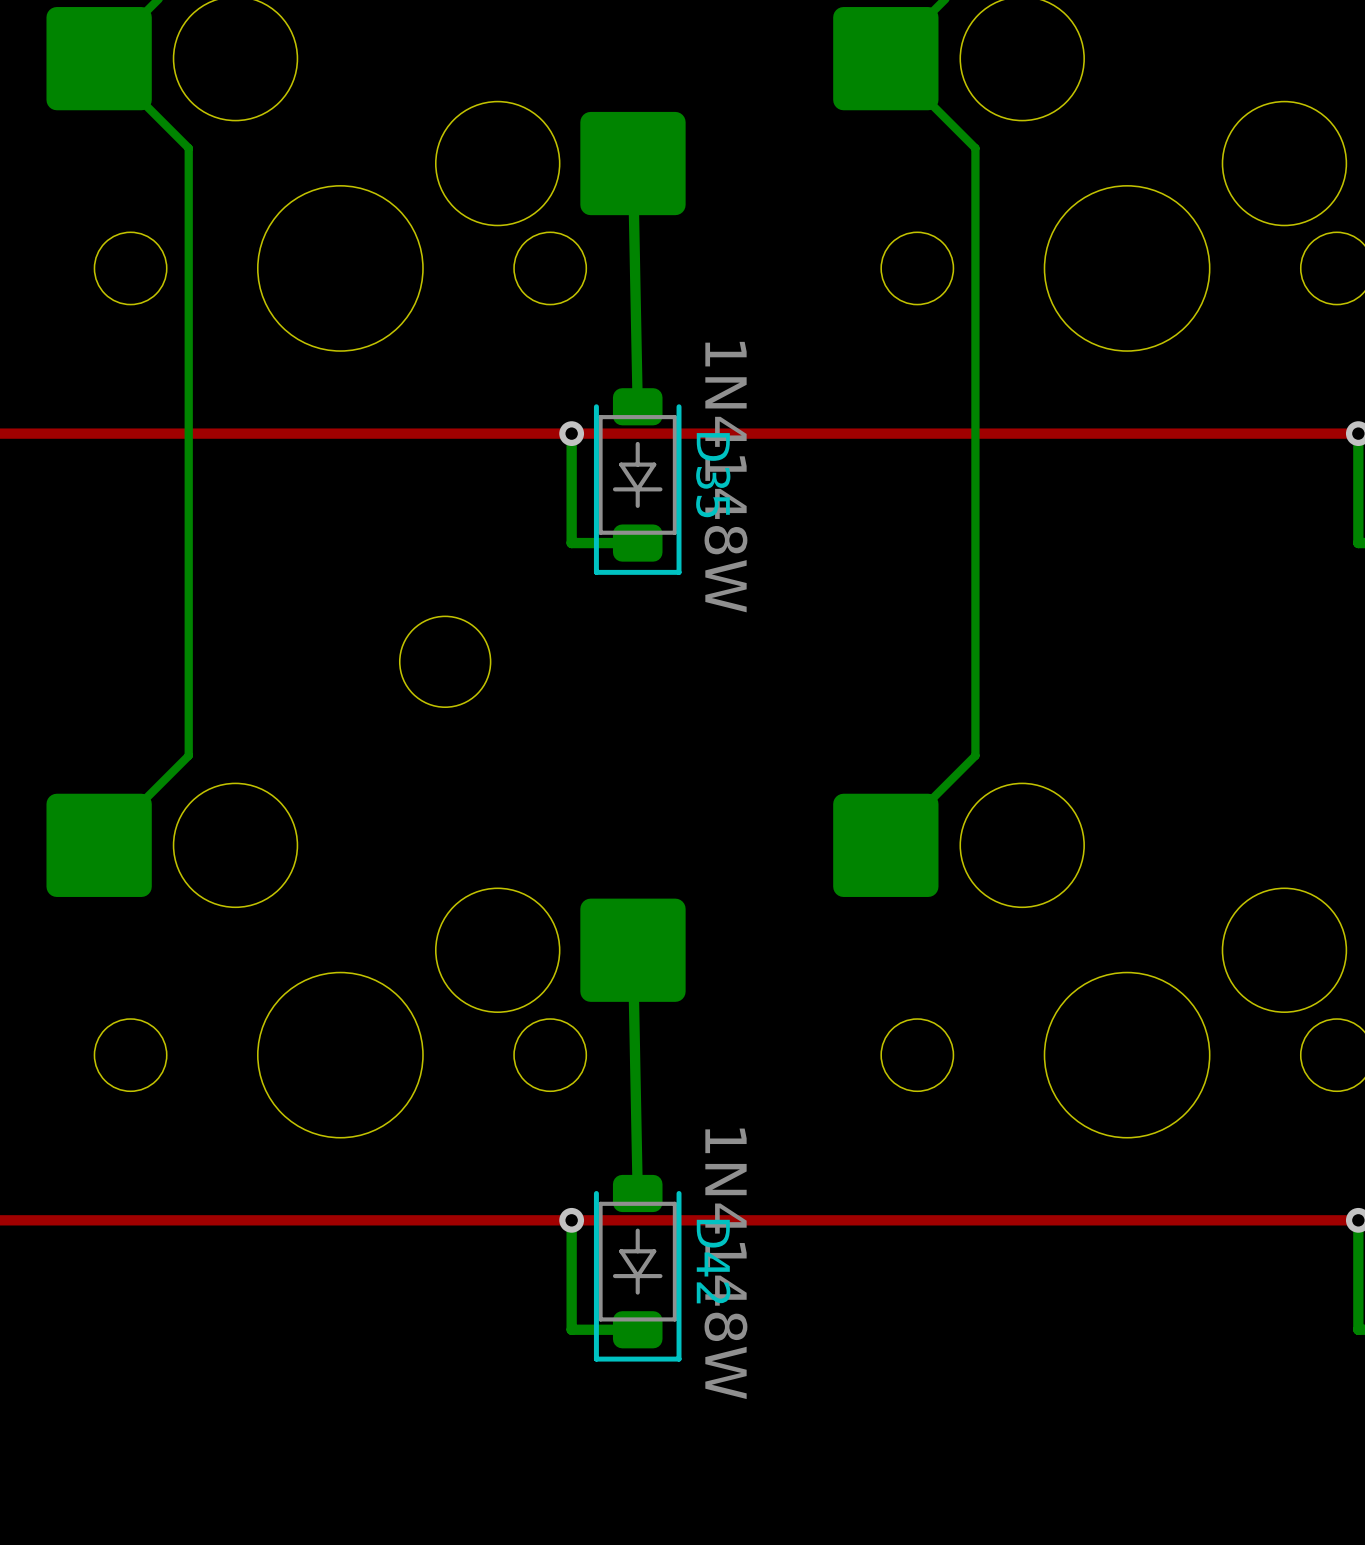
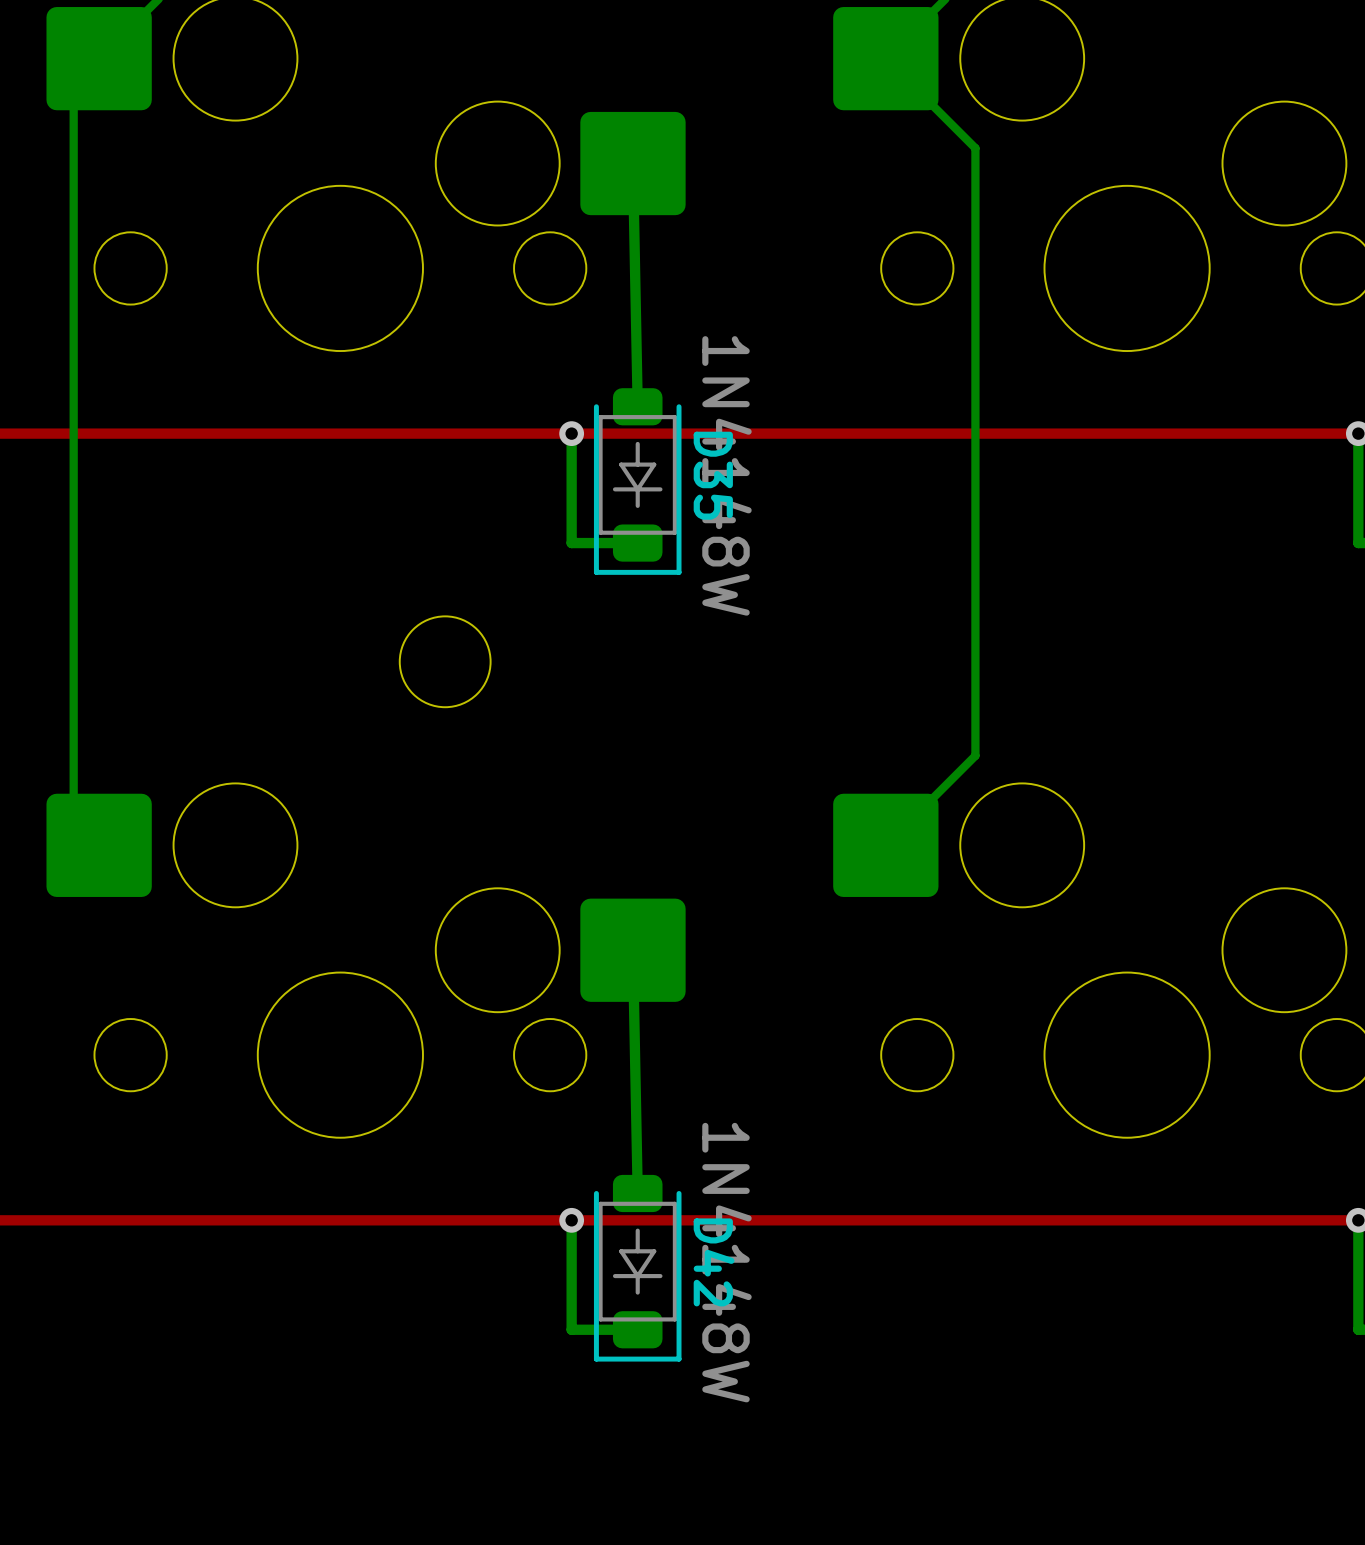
bottom track: (99, 58) (188, 148) (188, 755) (99, 845) -> (99, 58) (73, 84) (73, 819) (99, 845)

